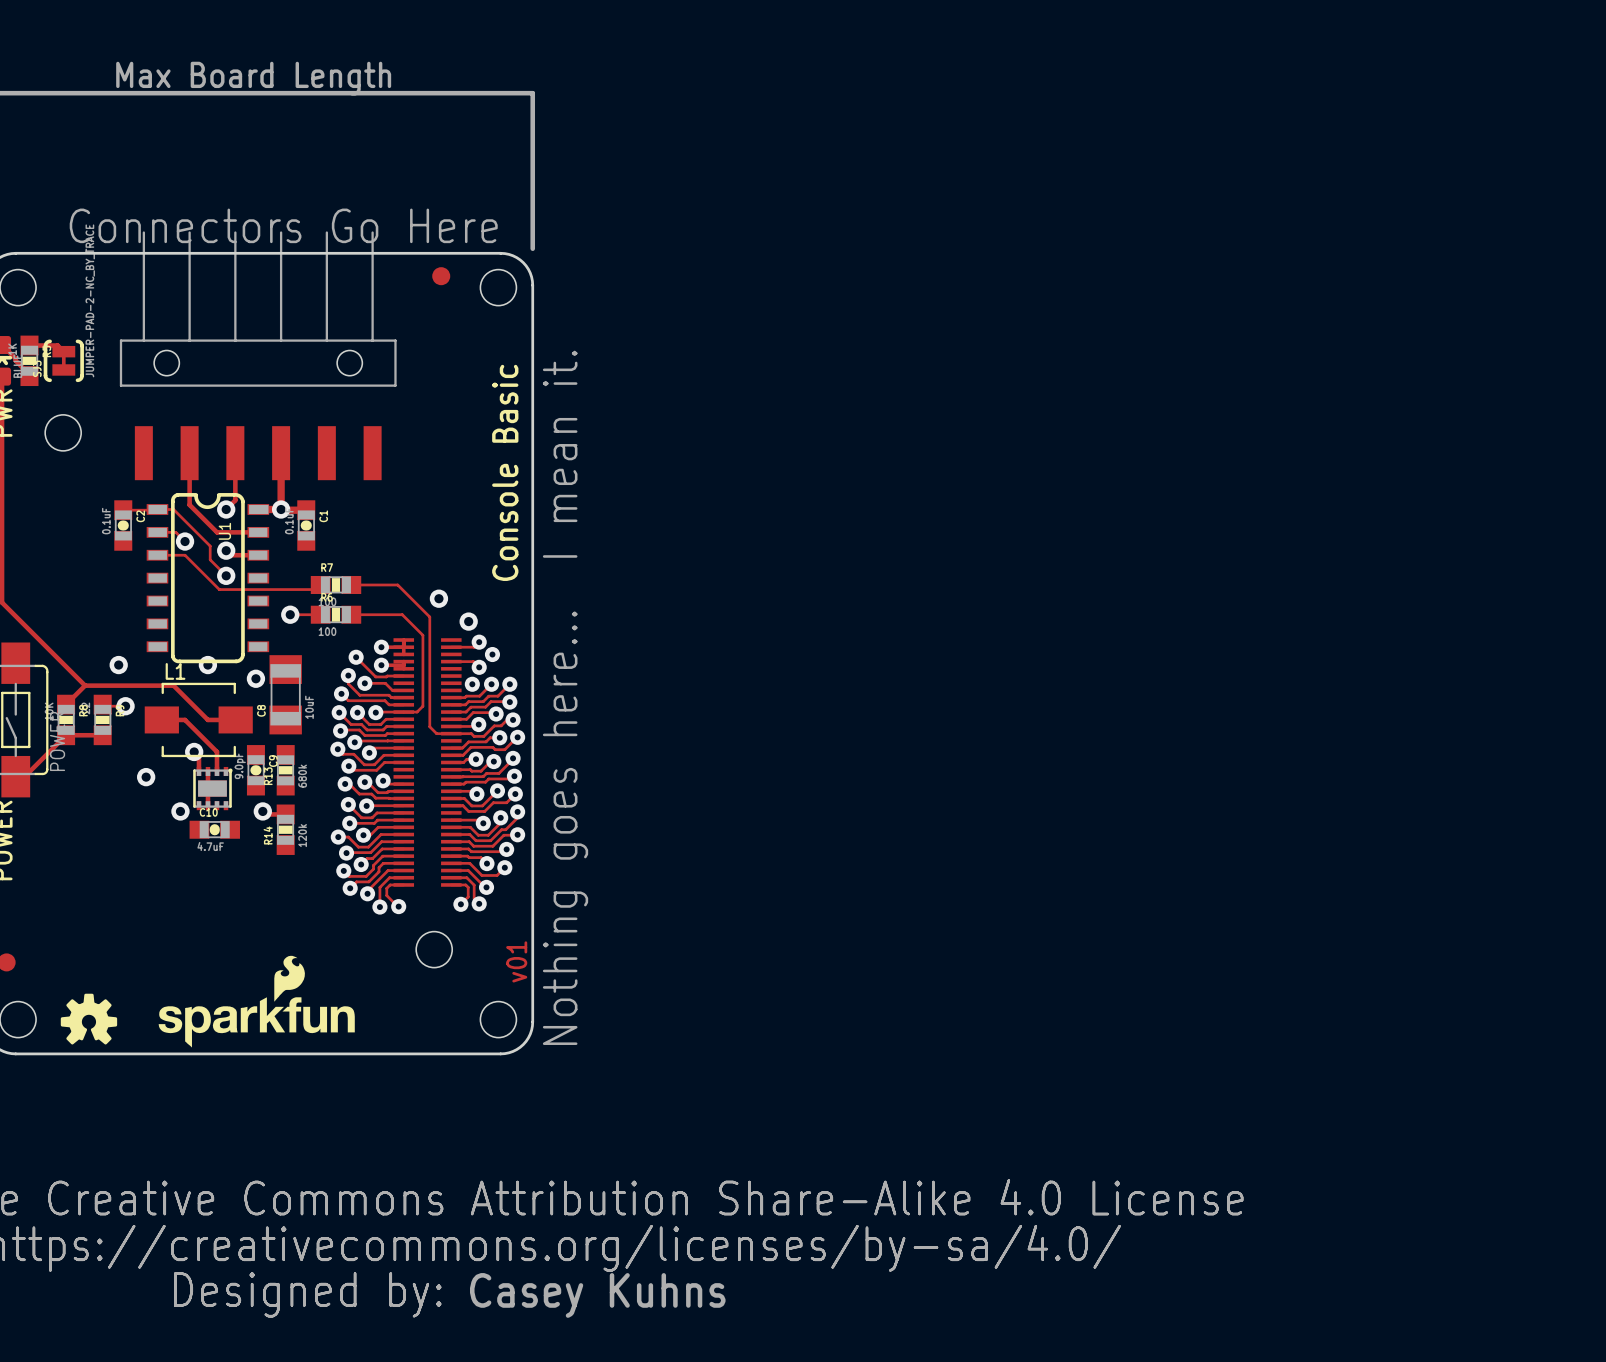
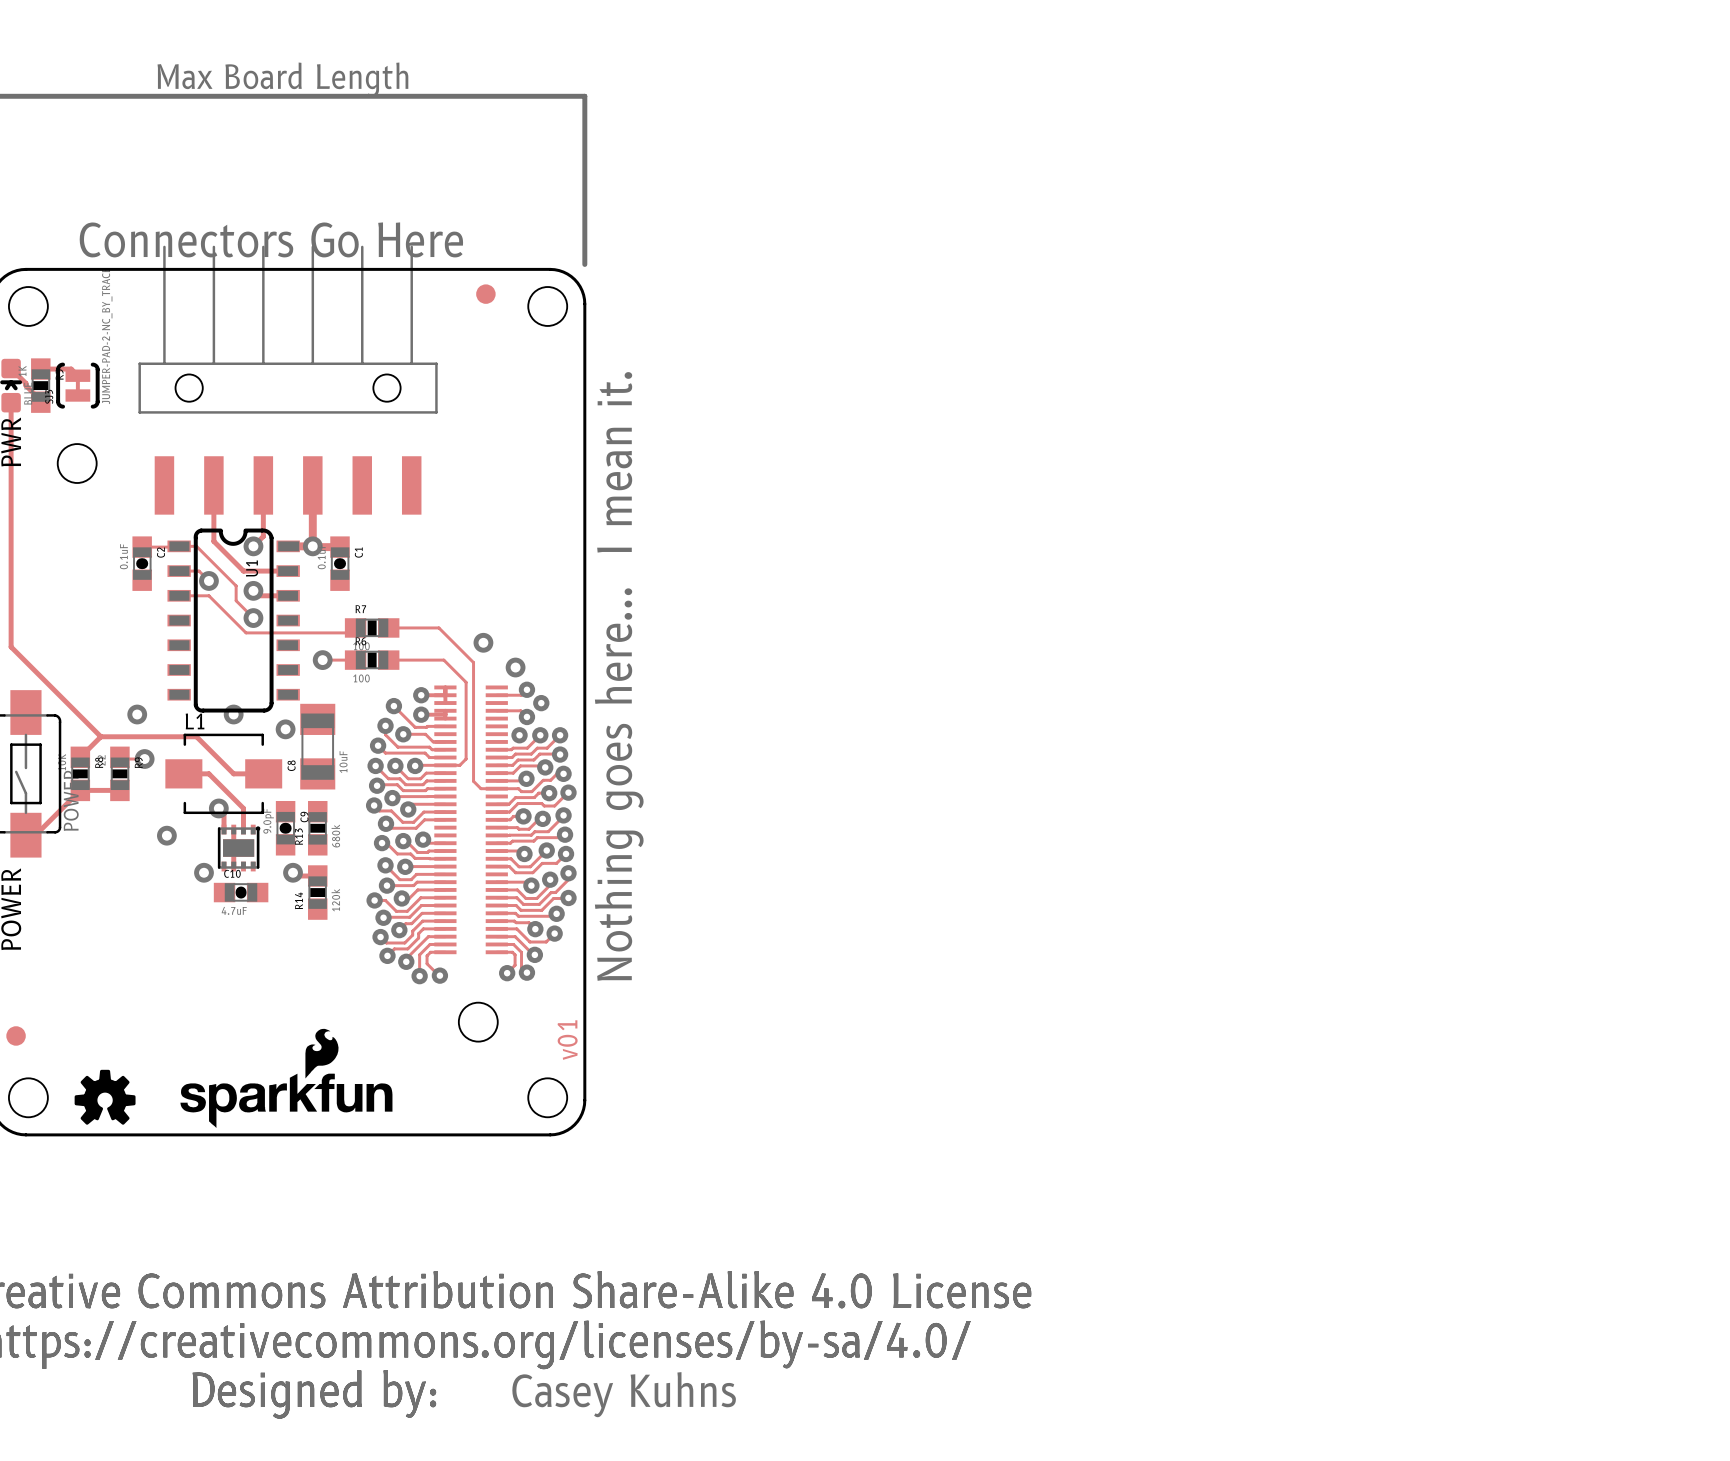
text: Console Basic (505, 472) -> none

